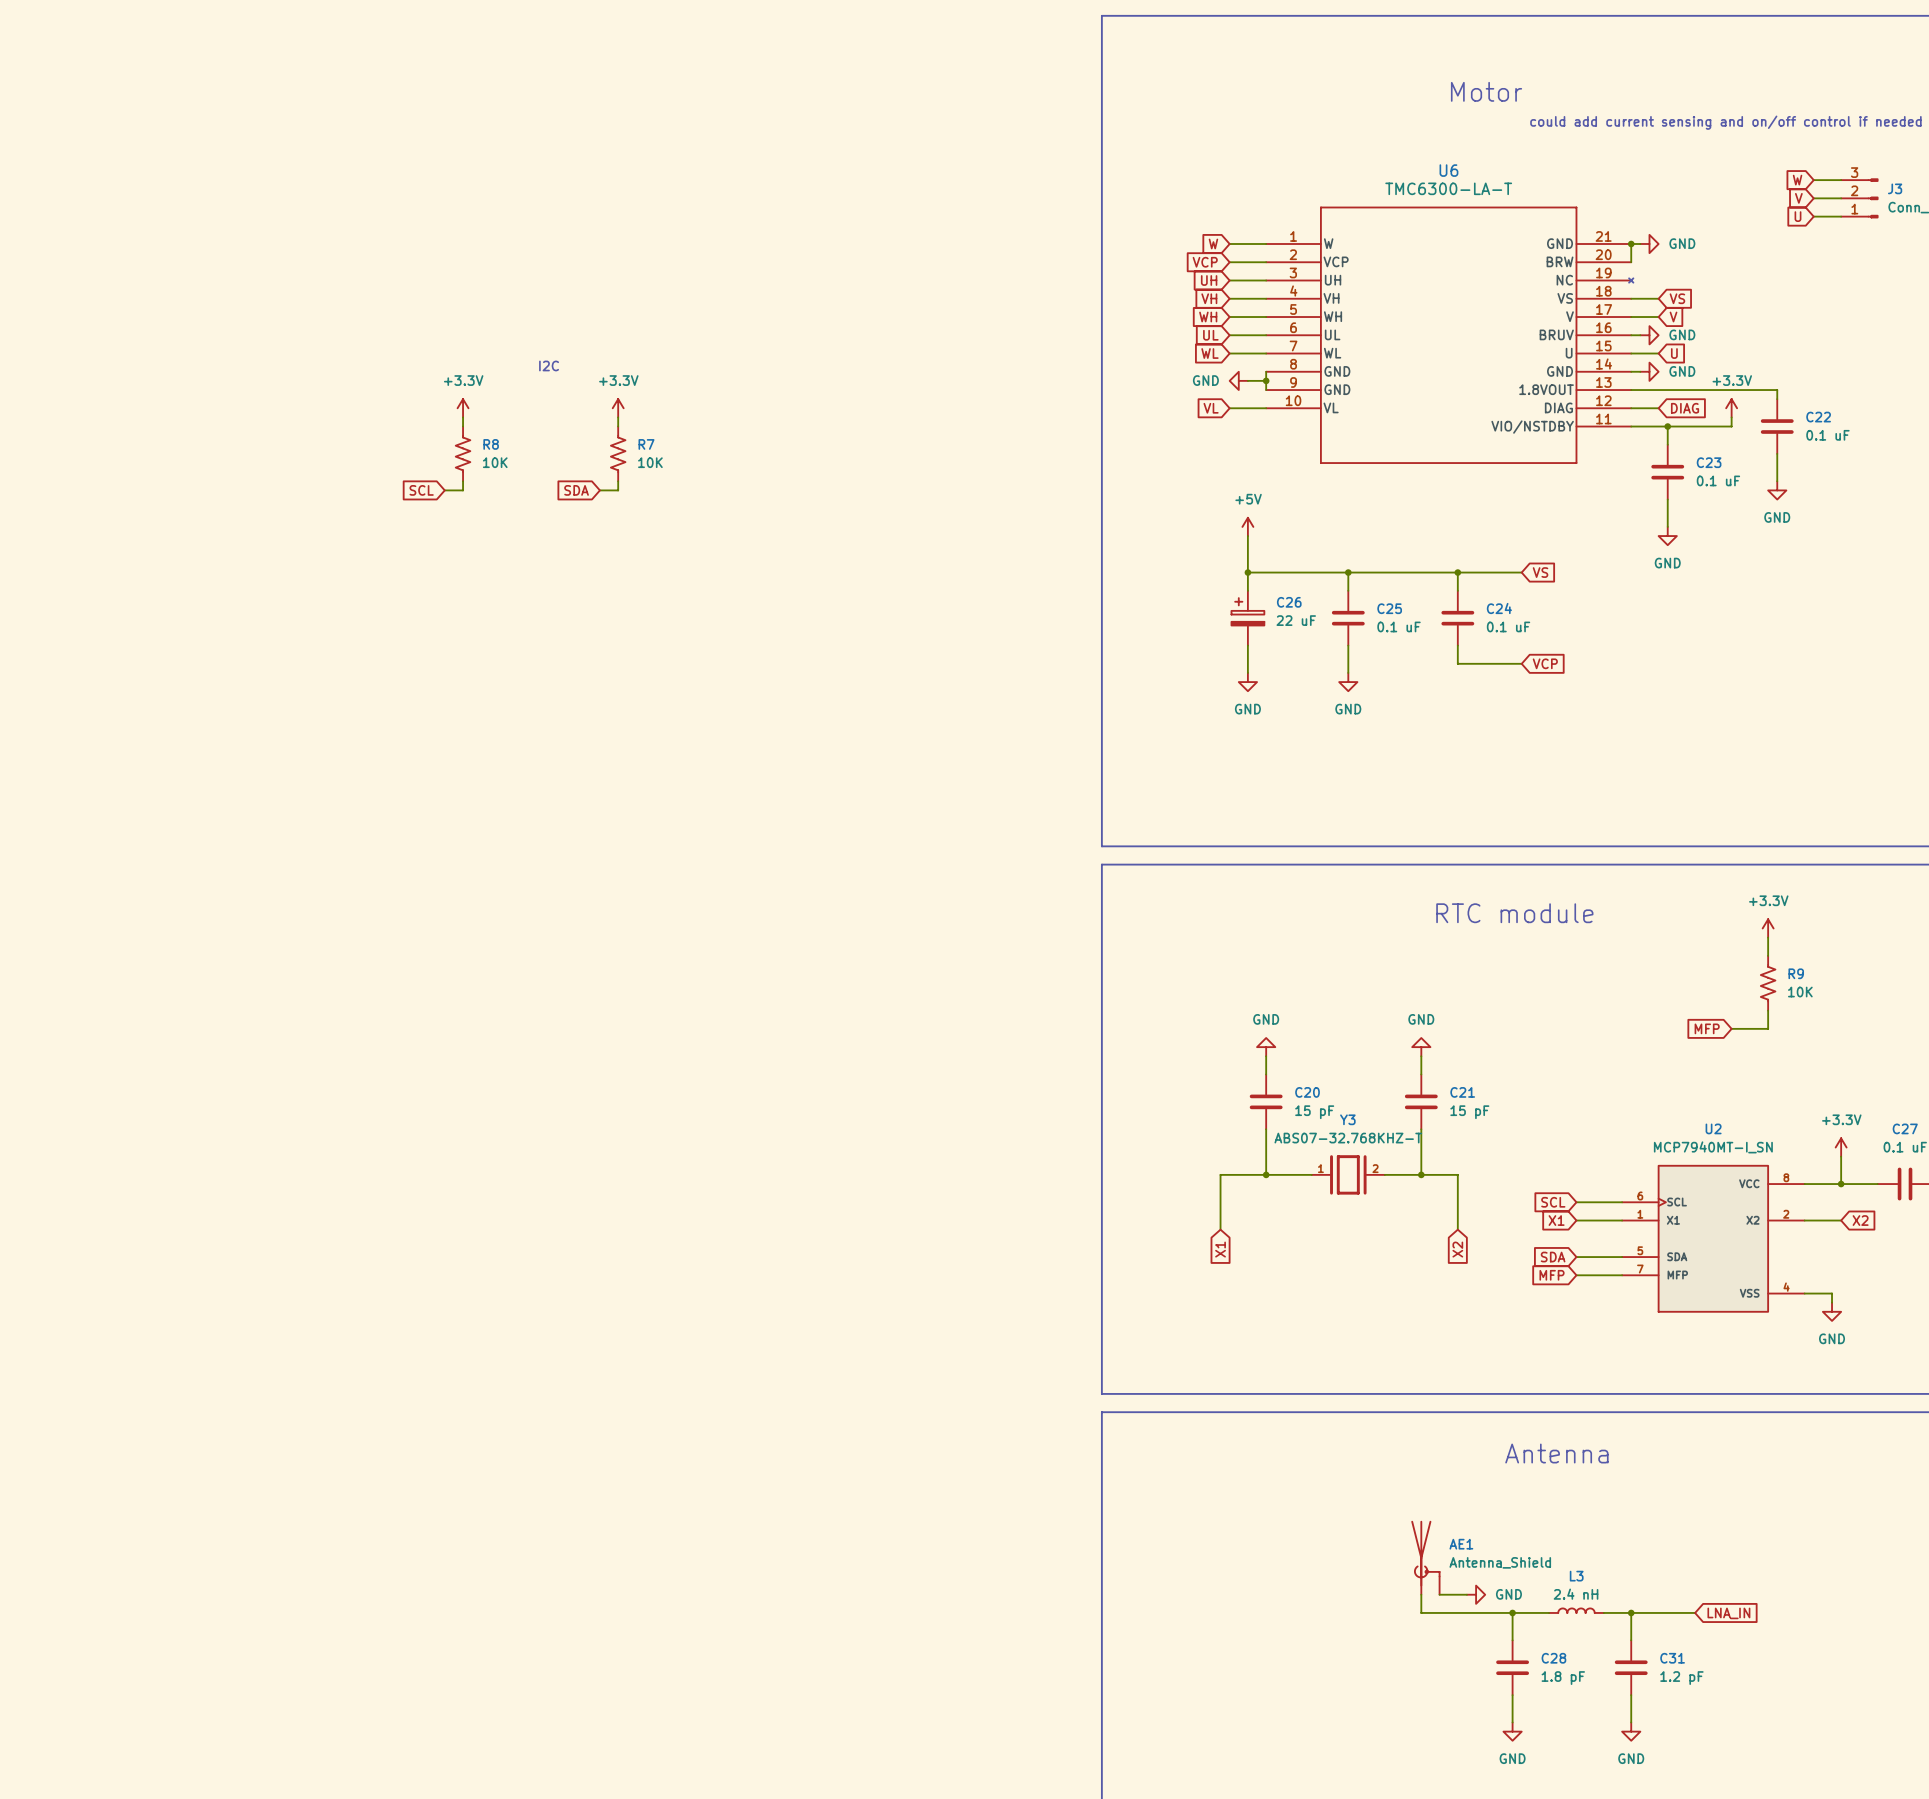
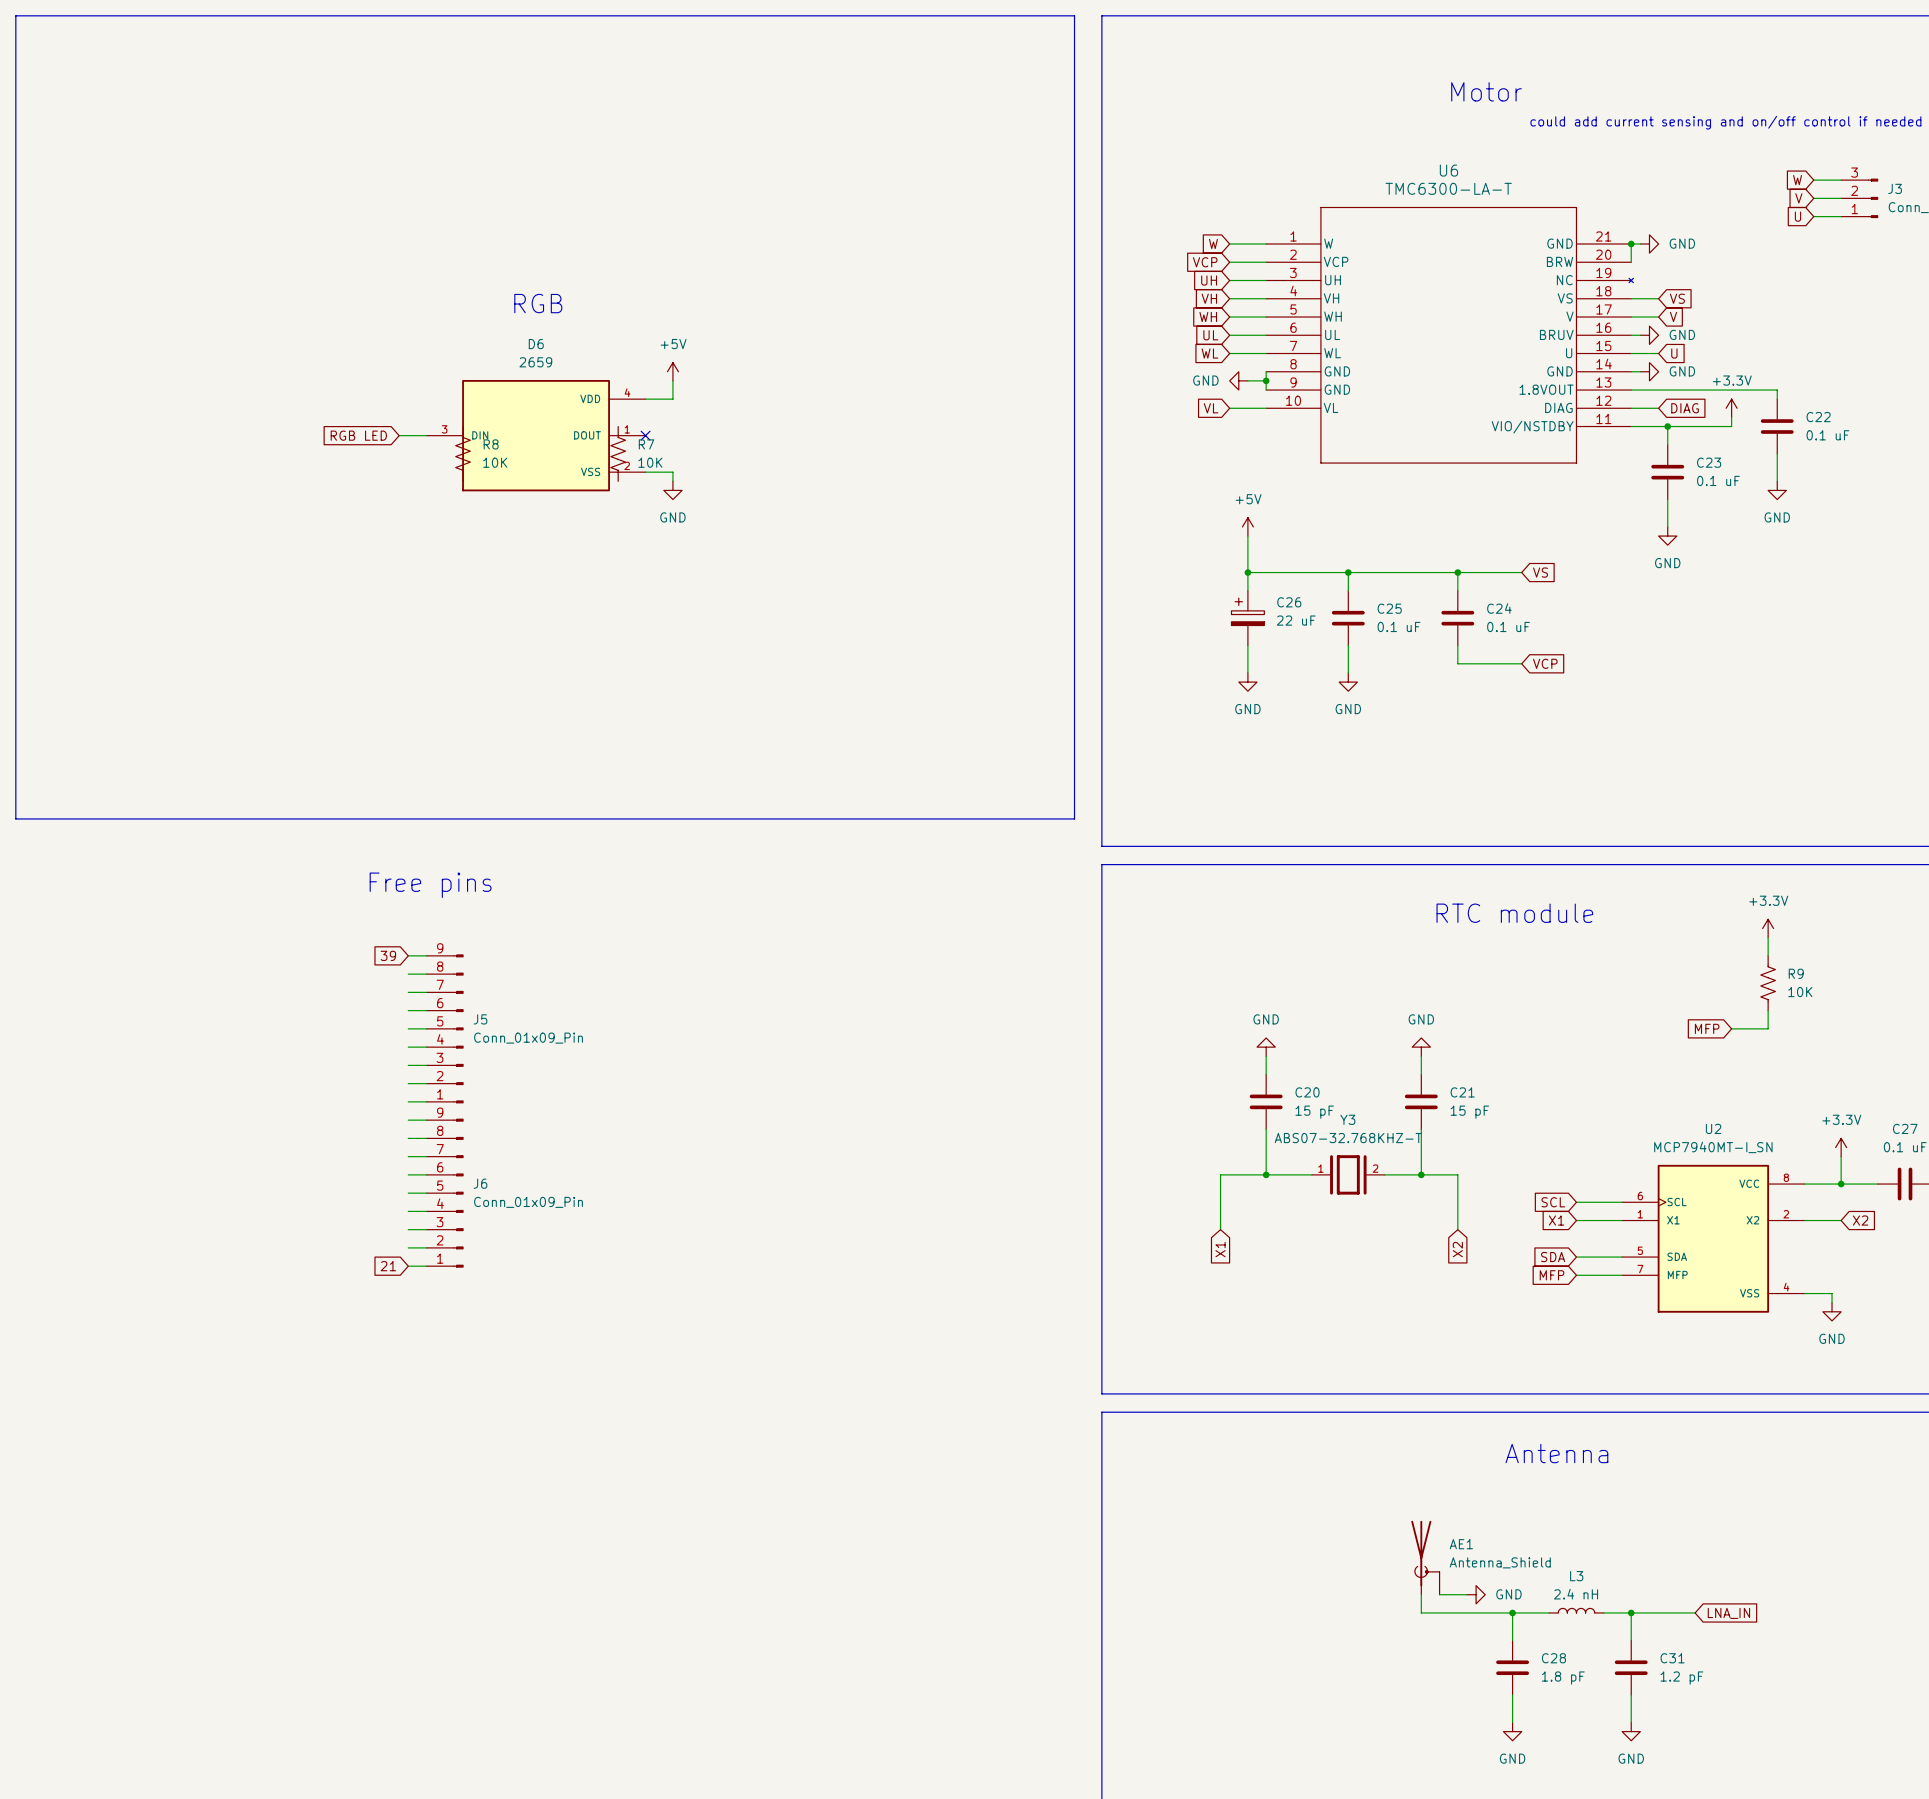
line: none -> (15, 15) (1074, 15) (1074, 818) (15, 818) (15, 15)
text: none -> RGB (538, 303)
text: I2C (549, 365) -> none
power symbol: none -> +5V (672, 371)
wire: none -> (672, 380) (672, 399) (645, 399)
power symbol: +3.3V (463, 408) -> none
power symbol: +3.3V (618, 408) -> none
wire: (618, 417) (618, 426) -> none
global label: none -> RGB LED (358, 435)
wire: none -> (399, 435) (426, 435)
D6: none -> 2659 (536, 435)
no-connect mark: none -> (645, 435)
wire: none -> (645, 472) (672, 472) (672, 481)
wire: (463, 481) (463, 490) (444, 490) -> none
wire: (618, 481) (618, 490) (599, 490) -> none
global label: SCL (421, 490) -> none
global label: SDA (576, 490) -> none
power symbol: none -> GND (672, 490)
text: none -> Free pins (430, 885)
global label: none -> 39 (388, 955)
wire: none -> (408, 955) (426, 955)
wire: none -> (408, 974) (426, 974)
wire: none -> (408, 992) (426, 992)
wire: none -> (408, 1010) (426, 1010)
wire: none -> (408, 1028) (426, 1028)
J5: none -> Conn_01x09_Pin (445, 1028)
wire: none -> (408, 1047) (426, 1047)
wire: none -> (408, 1065) (426, 1065)
wire: none -> (408, 1083) (426, 1083)
wire: none -> (408, 1101) (426, 1101)
wire: none -> (408, 1120) (426, 1120)
wire: none -> (408, 1138) (426, 1138)
wire: none -> (408, 1156) (426, 1156)
wire: none -> (408, 1174) (426, 1174)
wire: none -> (408, 1193) (426, 1193)
J6: none -> Conn_01x09_Pin (445, 1193)
wire: none -> (408, 1211) (426, 1211)
wire: none -> (408, 1229) (426, 1229)
wire: none -> (408, 1247) (426, 1247)
global label: none -> 21 (388, 1266)
wire: none -> (408, 1266) (426, 1266)

